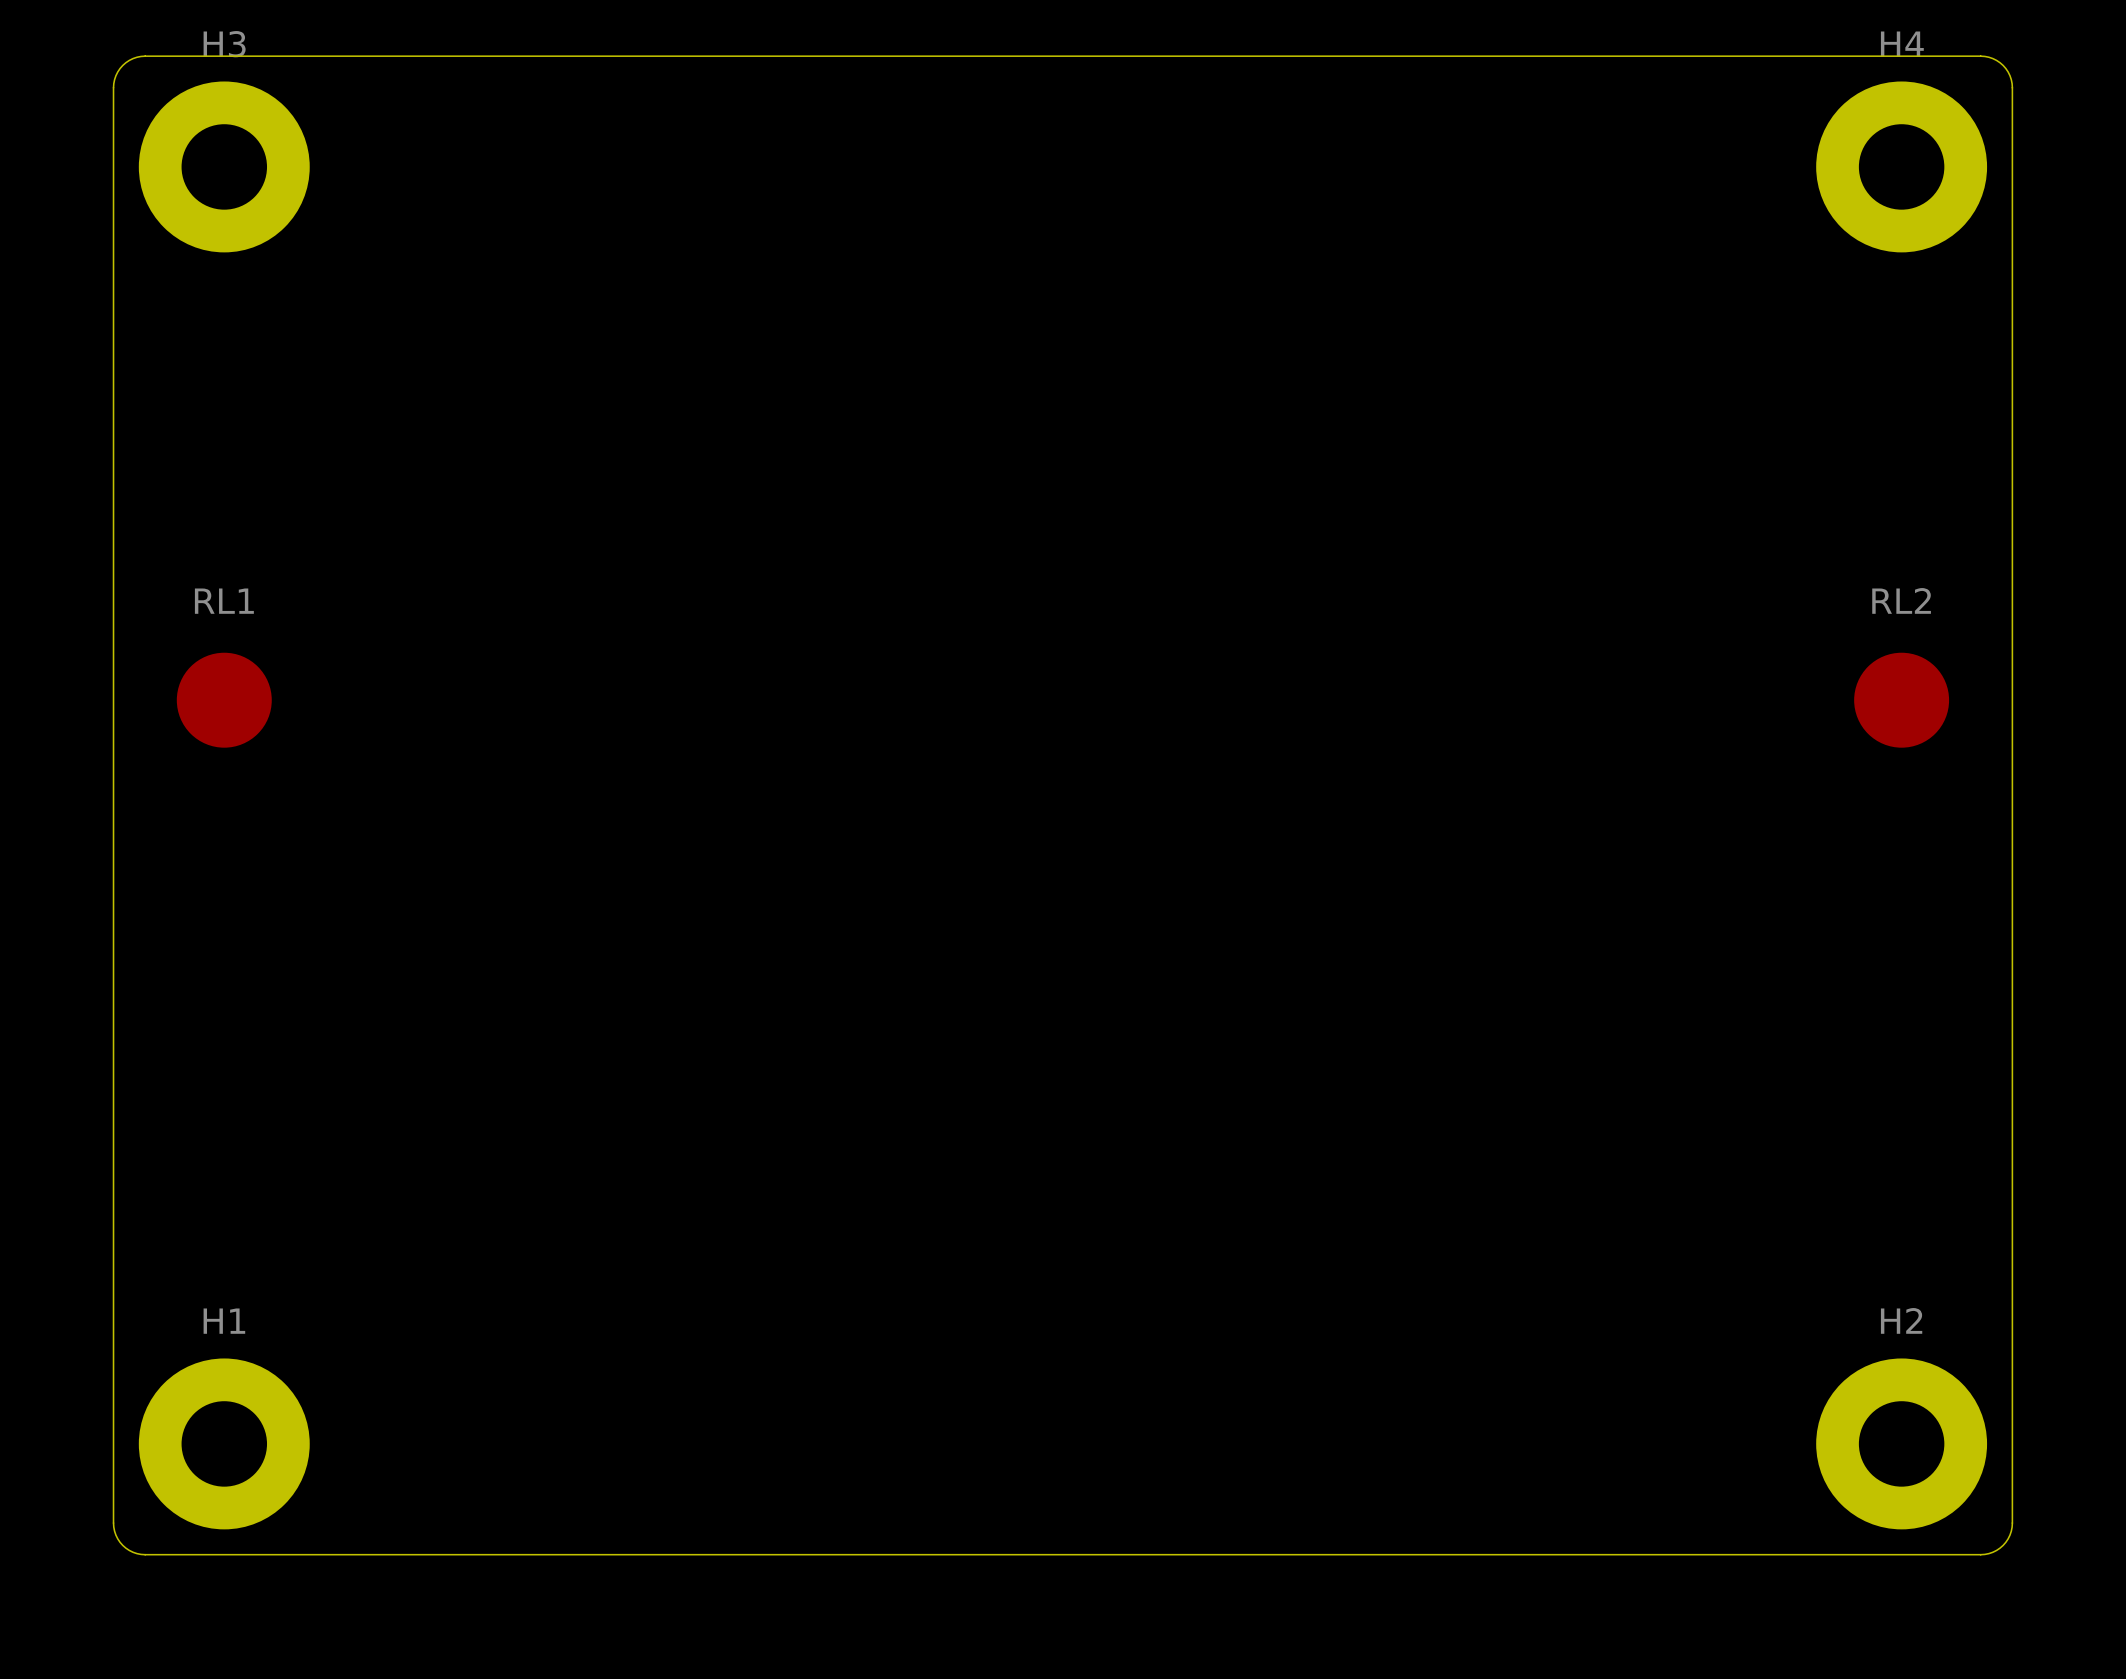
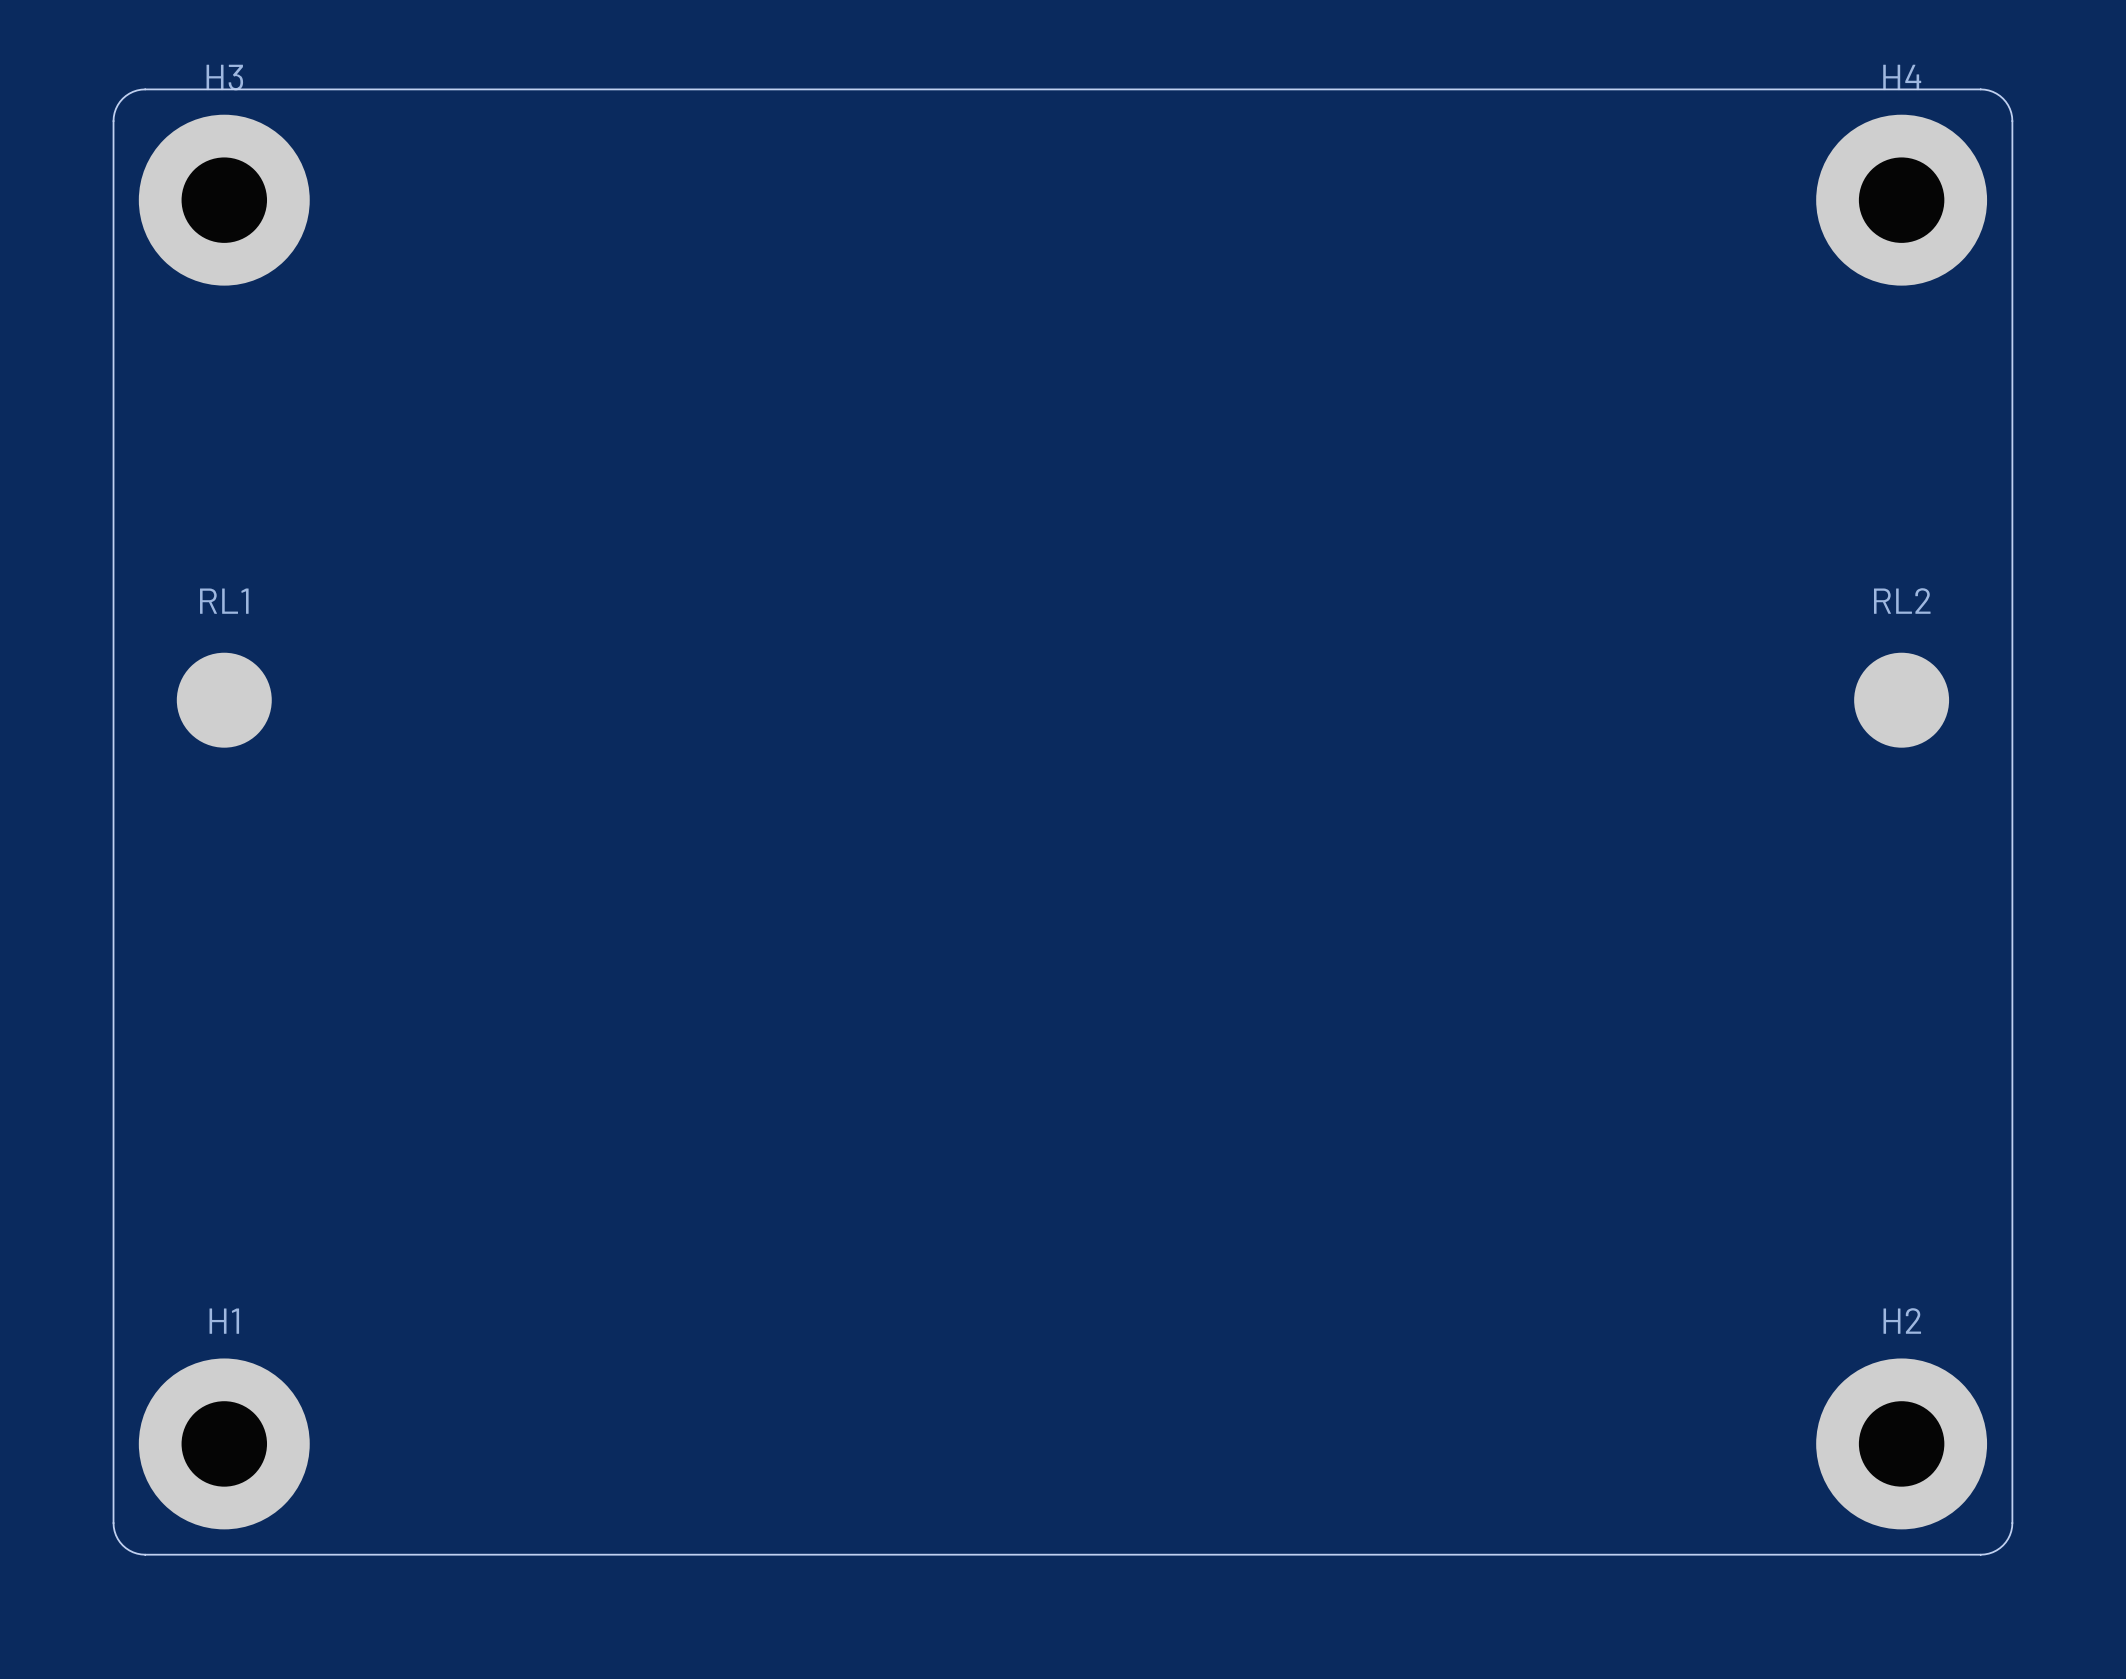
board edge: (113, 121) (113, 87) (115, 75) (122, 65) (129, 60) (145, 56) (1980, 56) (1996, 60) (2003, 65) (2009, 75) (2012, 87) (2012, 121) -> (113, 121) (115, 108) (122, 98) (133, 91) (145, 89) (1980, 89) (1992, 91) (2003, 98) (2009, 108) (2012, 121)
H3 position: (224, 166) -> (224, 200)
H4 position: (1901, 166) -> (1901, 200)

